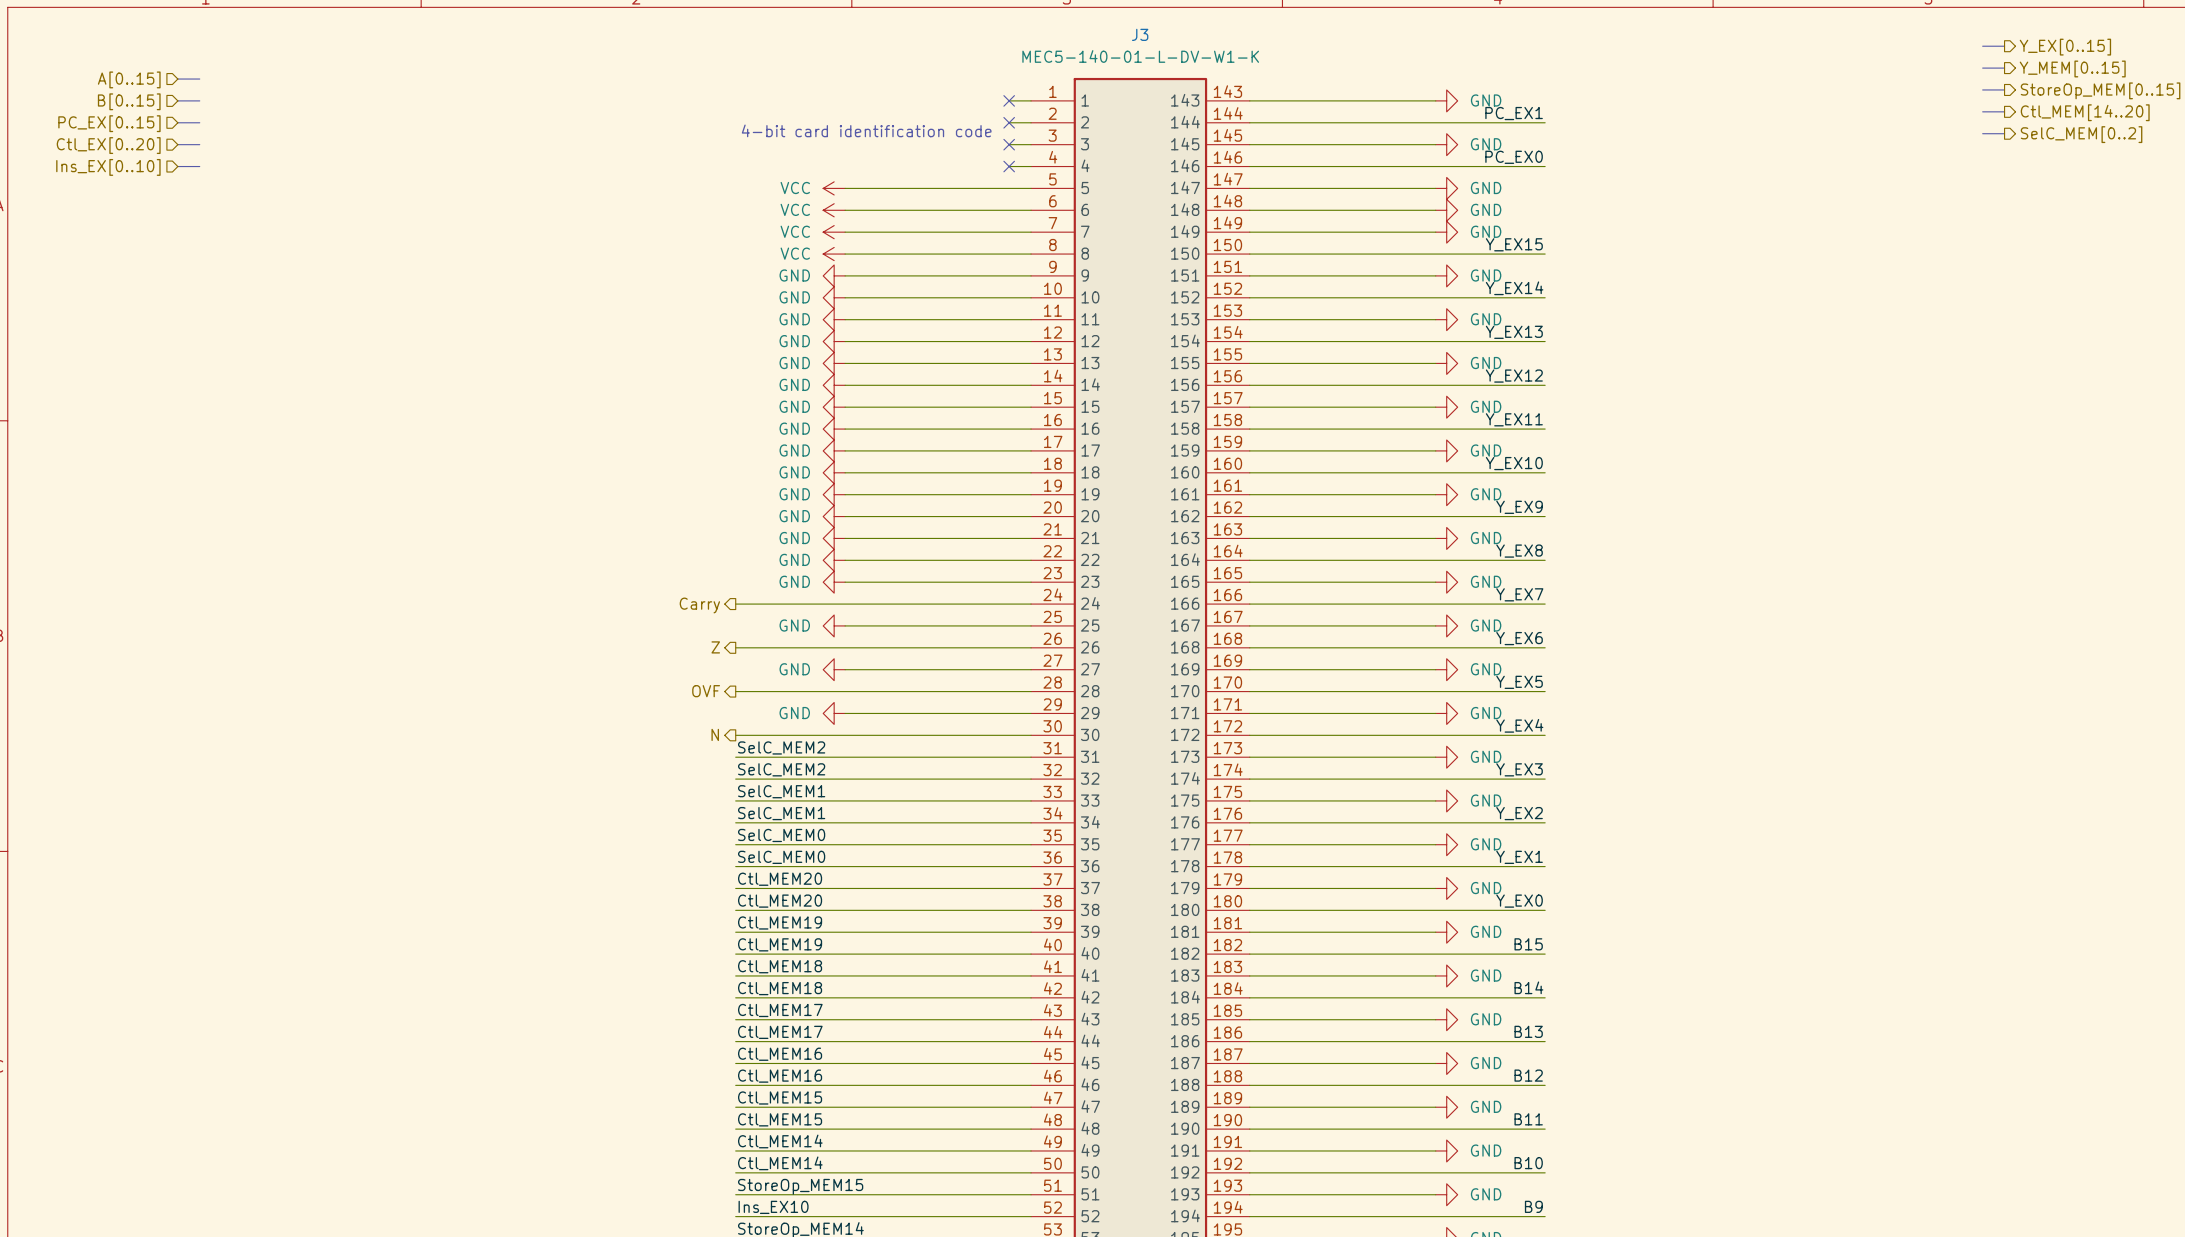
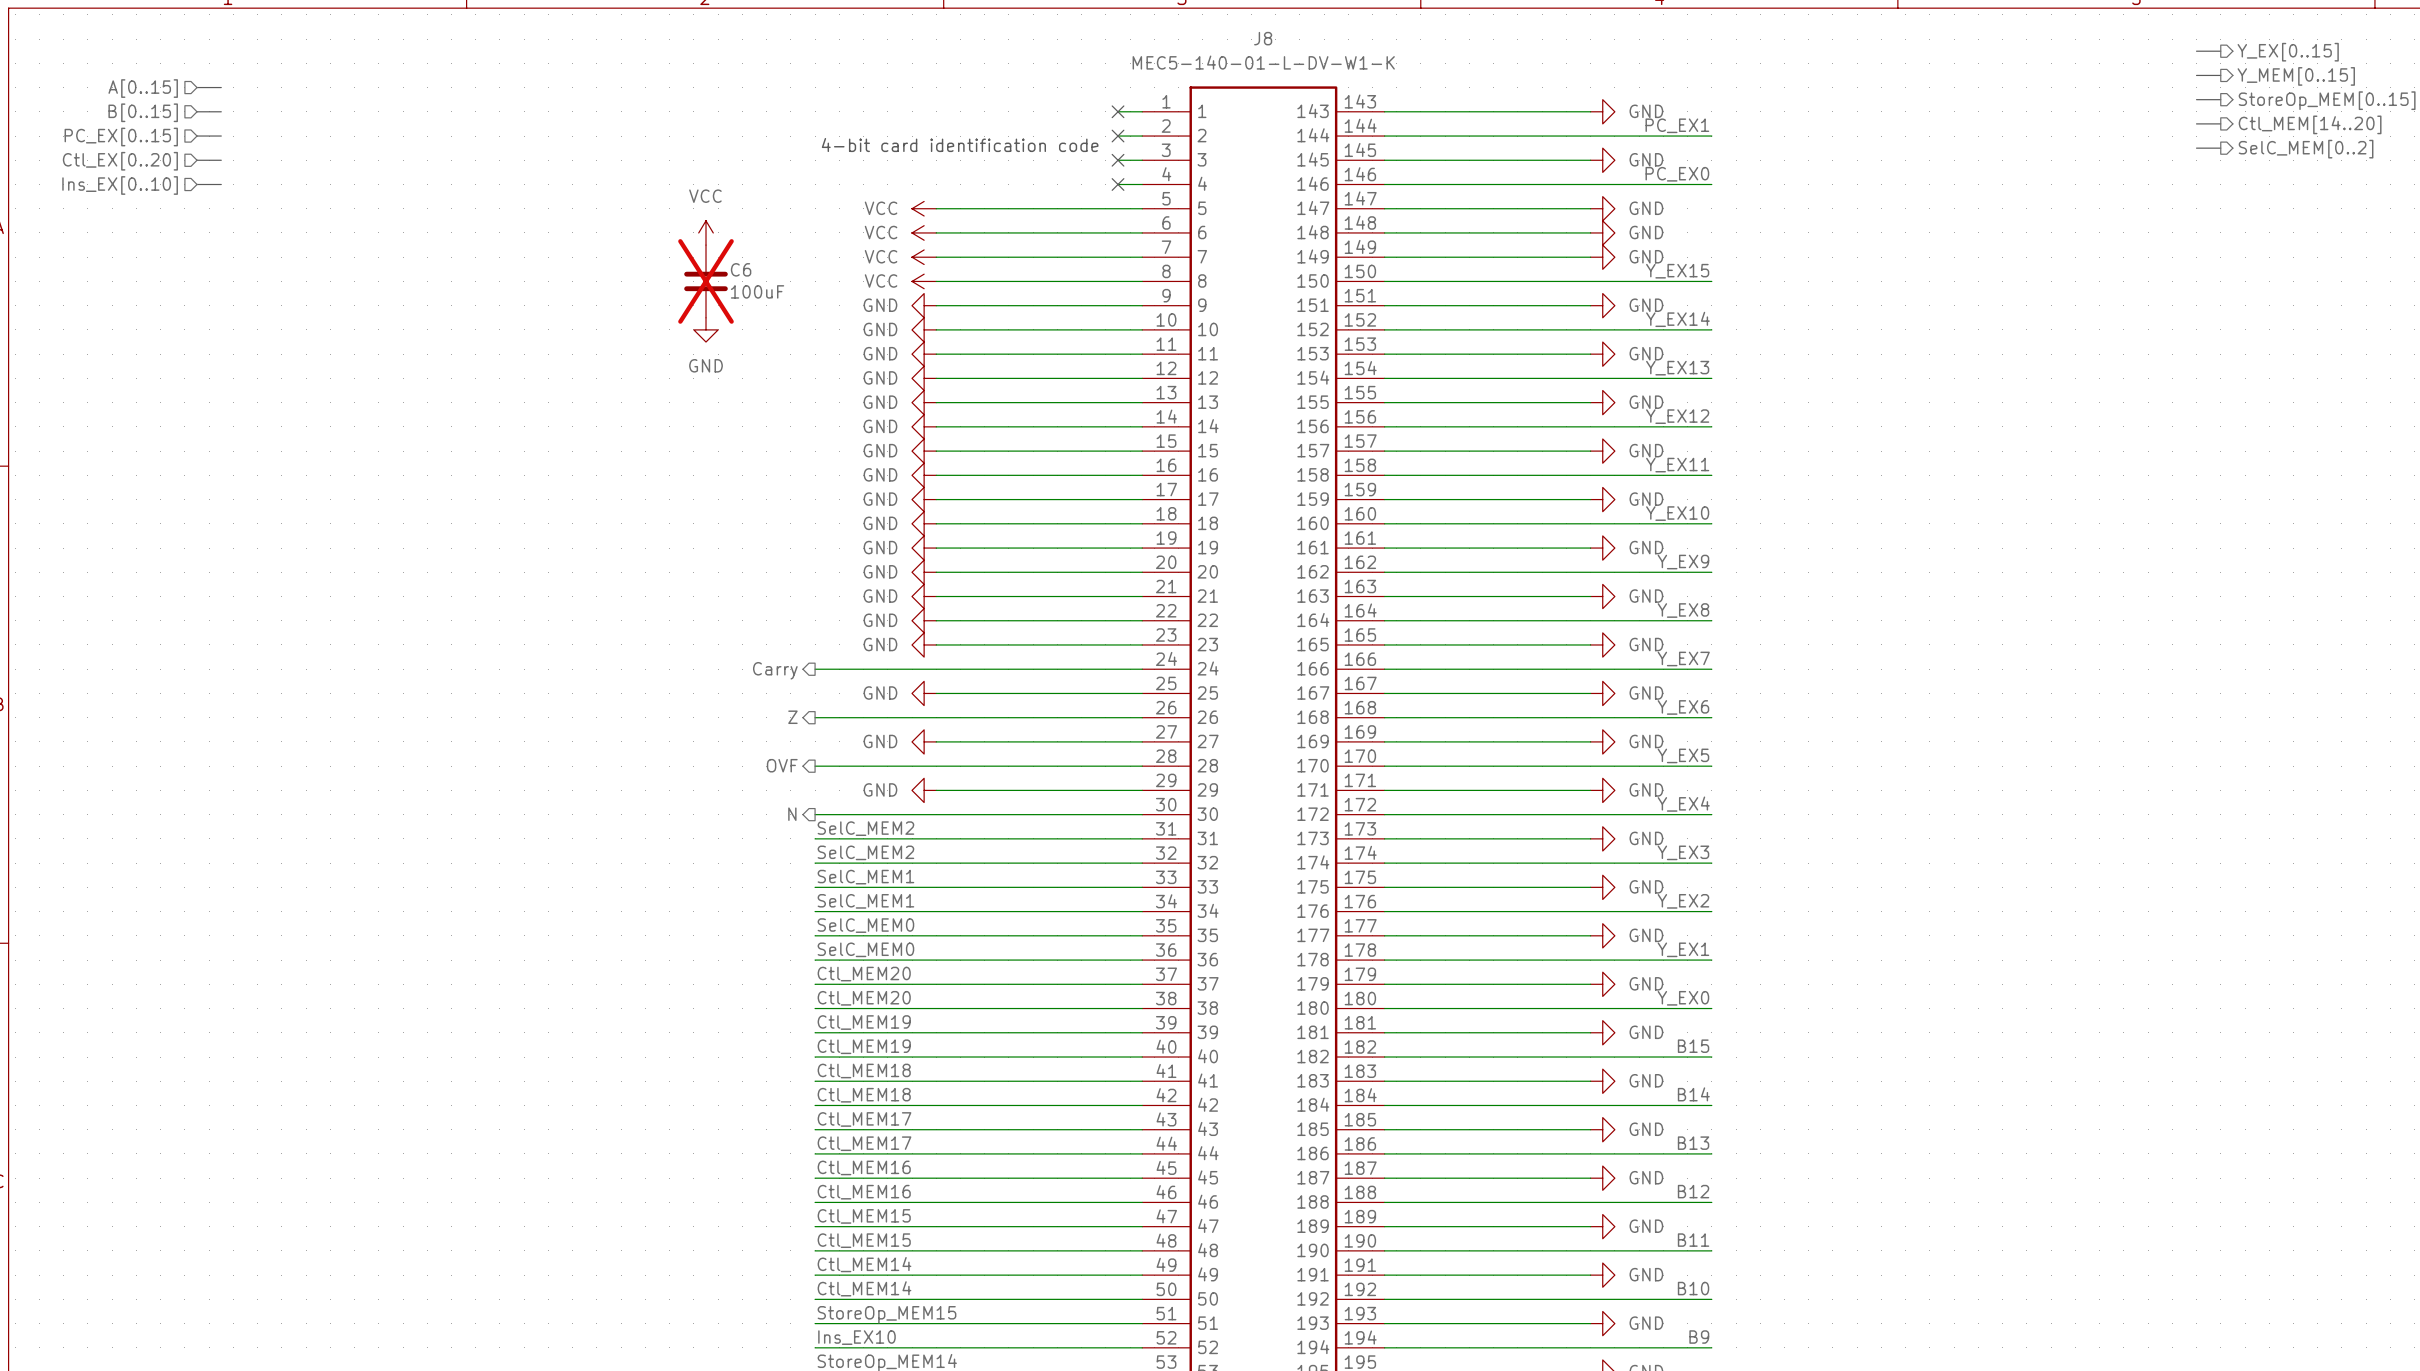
J3 name: J3 (1140, 34) -> J8 (1263, 38)
power symbol: none -> VCC (706, 232)
C6: none -> 100uF (706, 281)
power symbol: none -> GND (706, 329)

